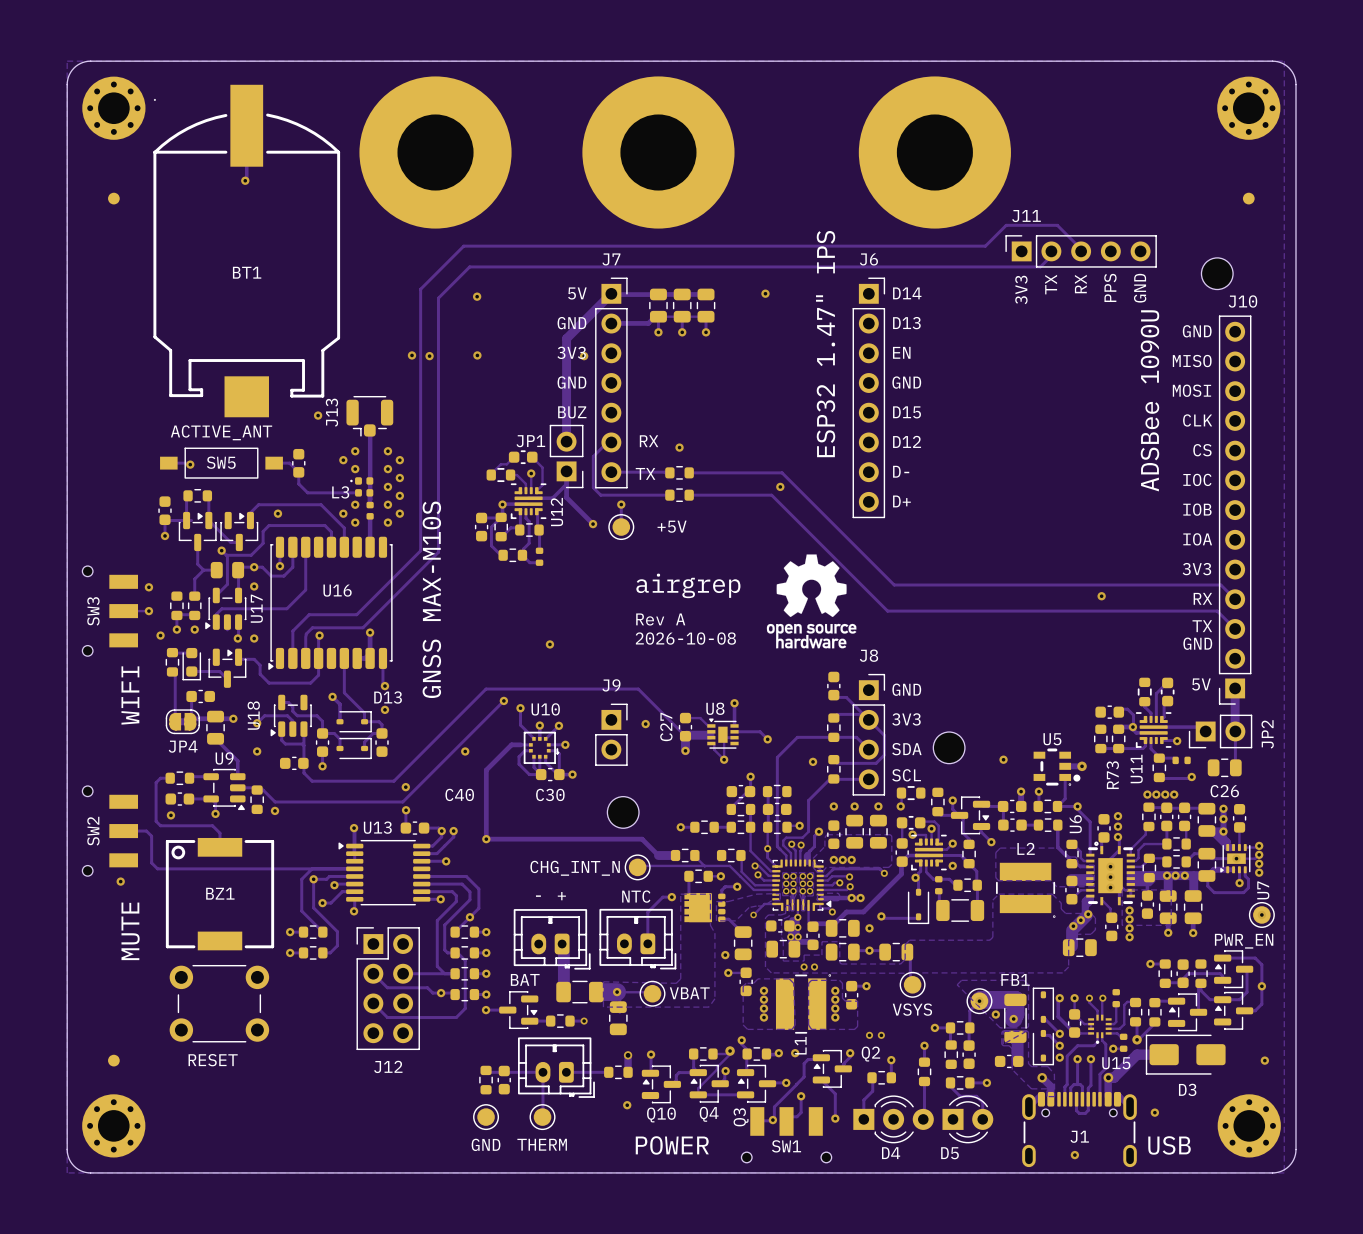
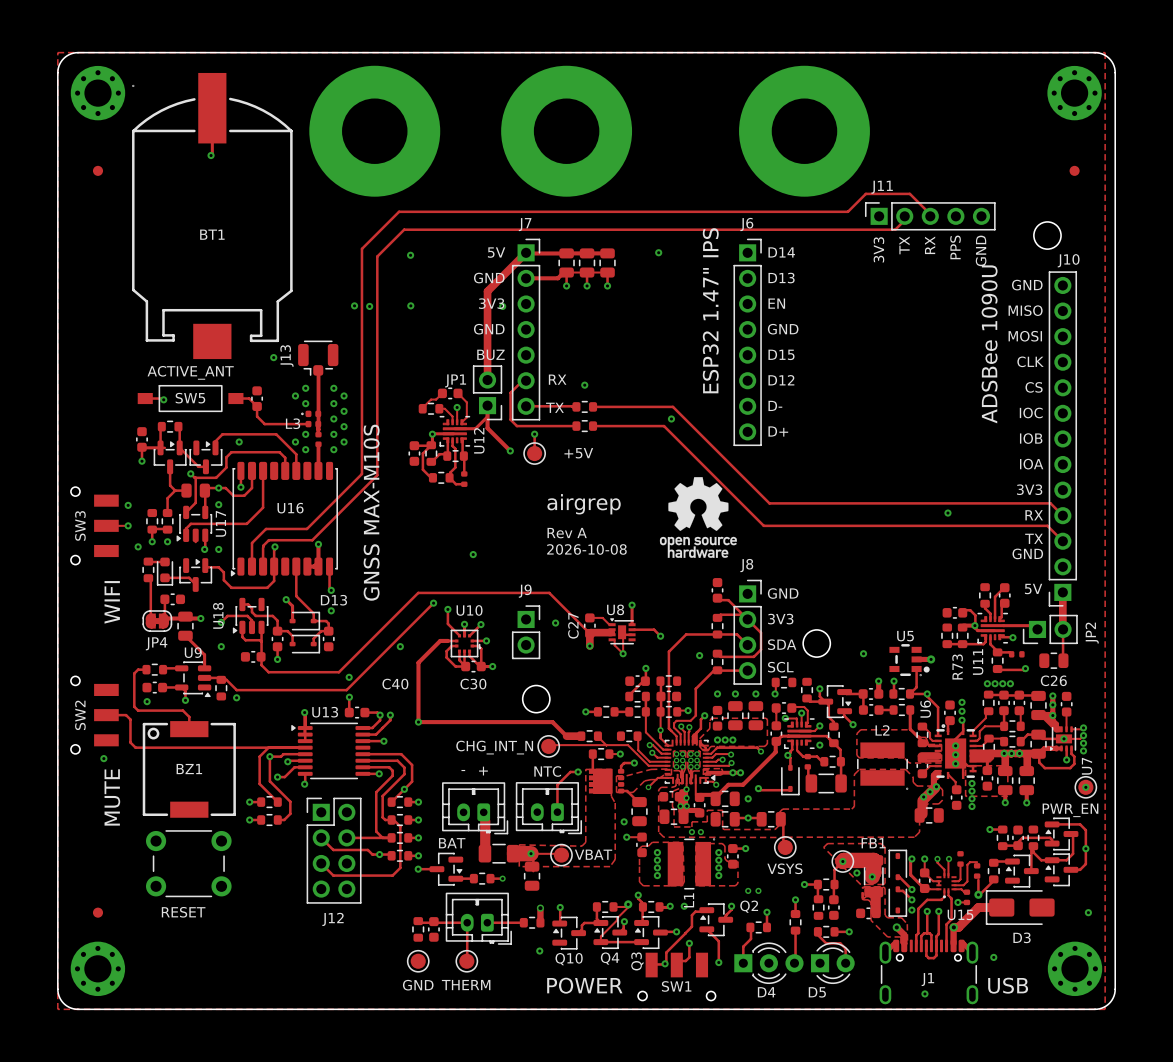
part footprint: [1128, 997, 1143, 1027] -> [973, 863, 981, 879]

